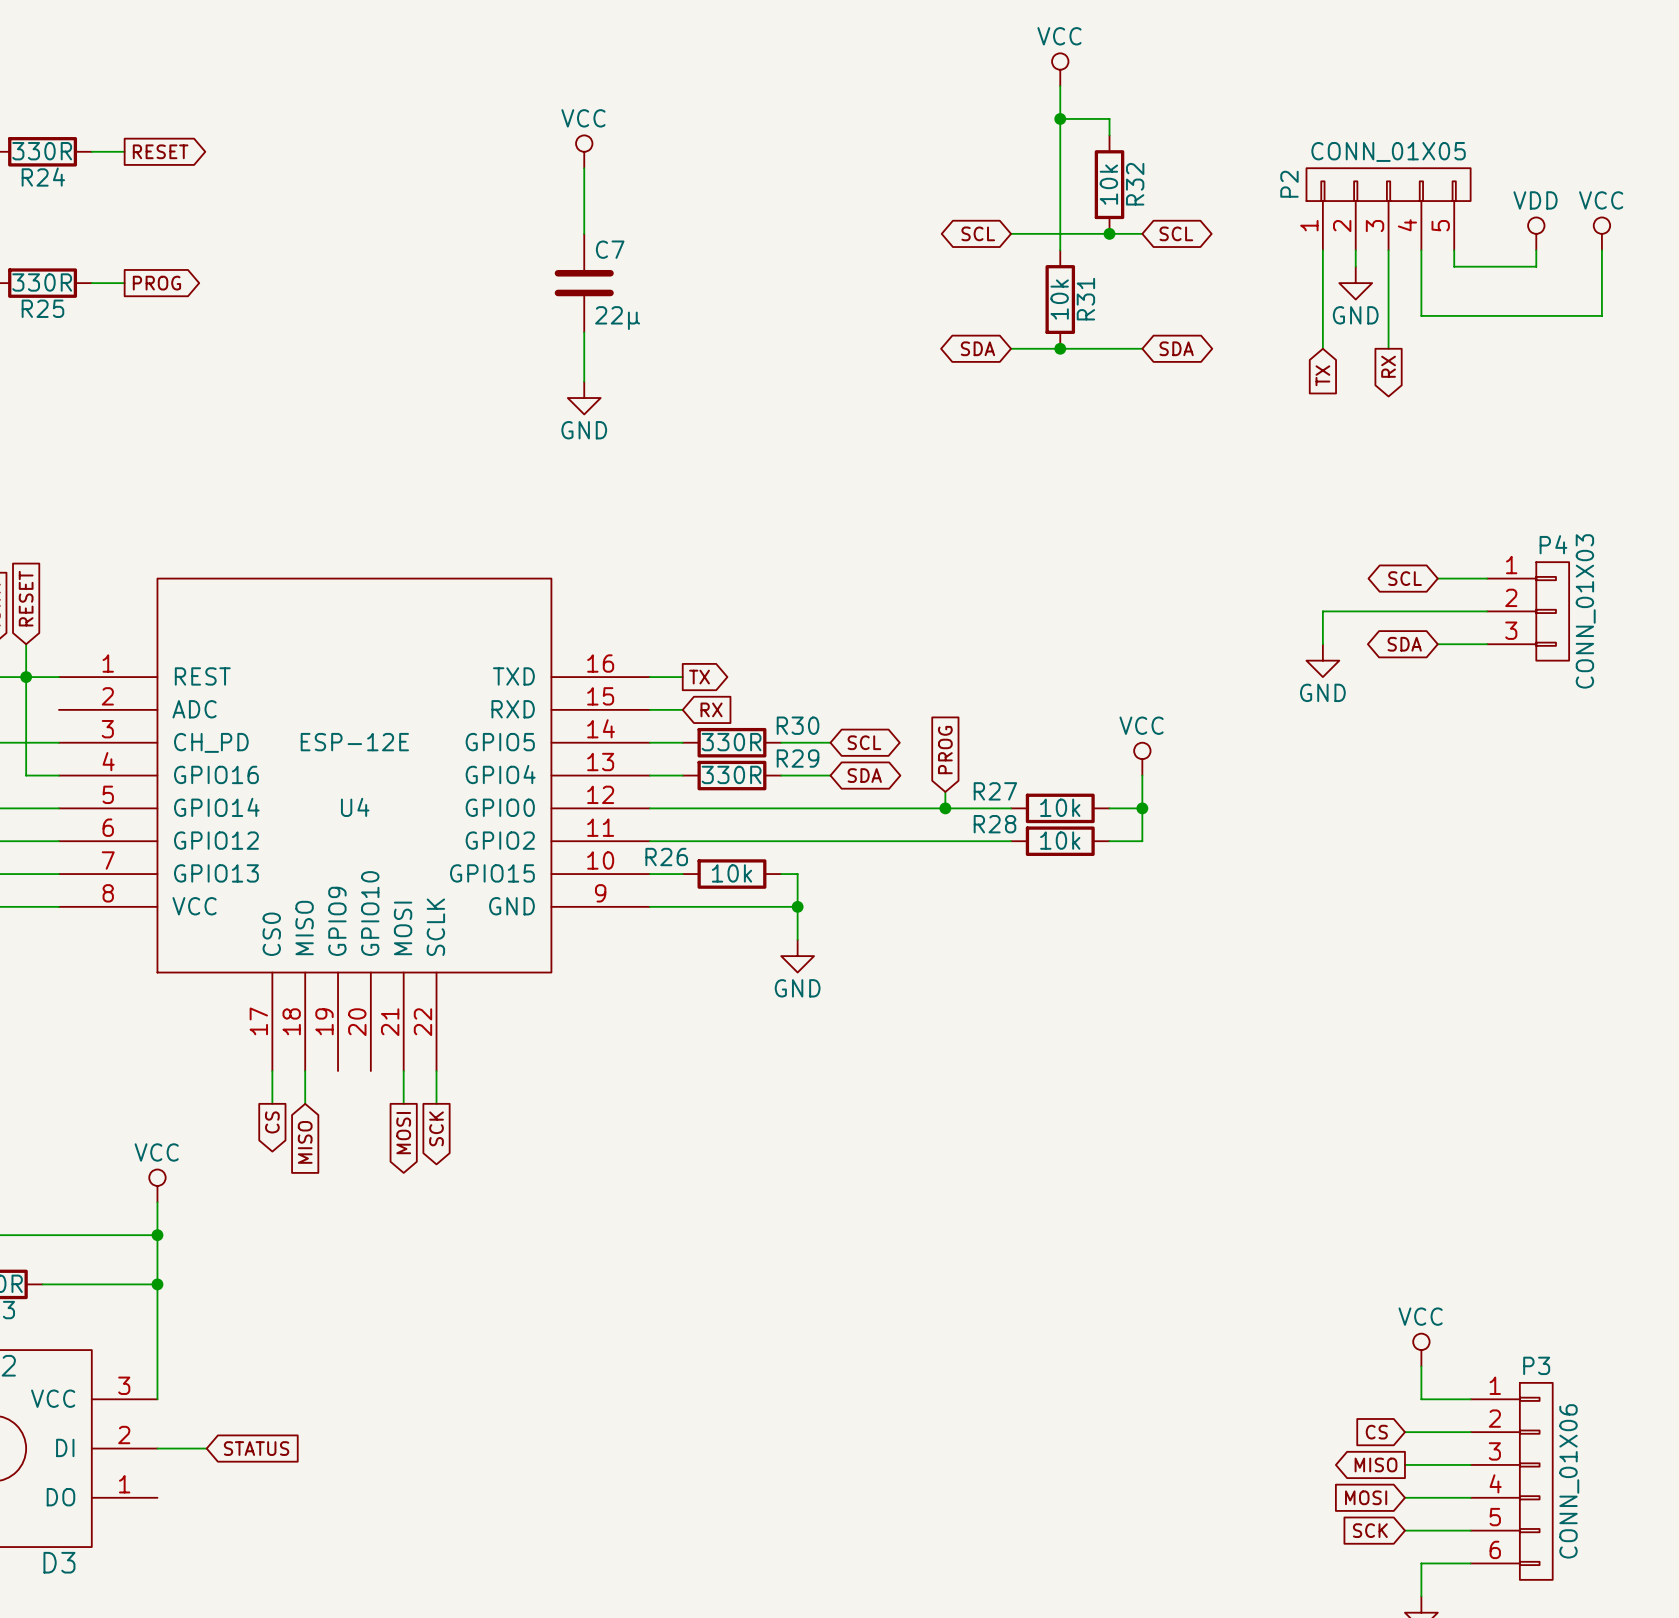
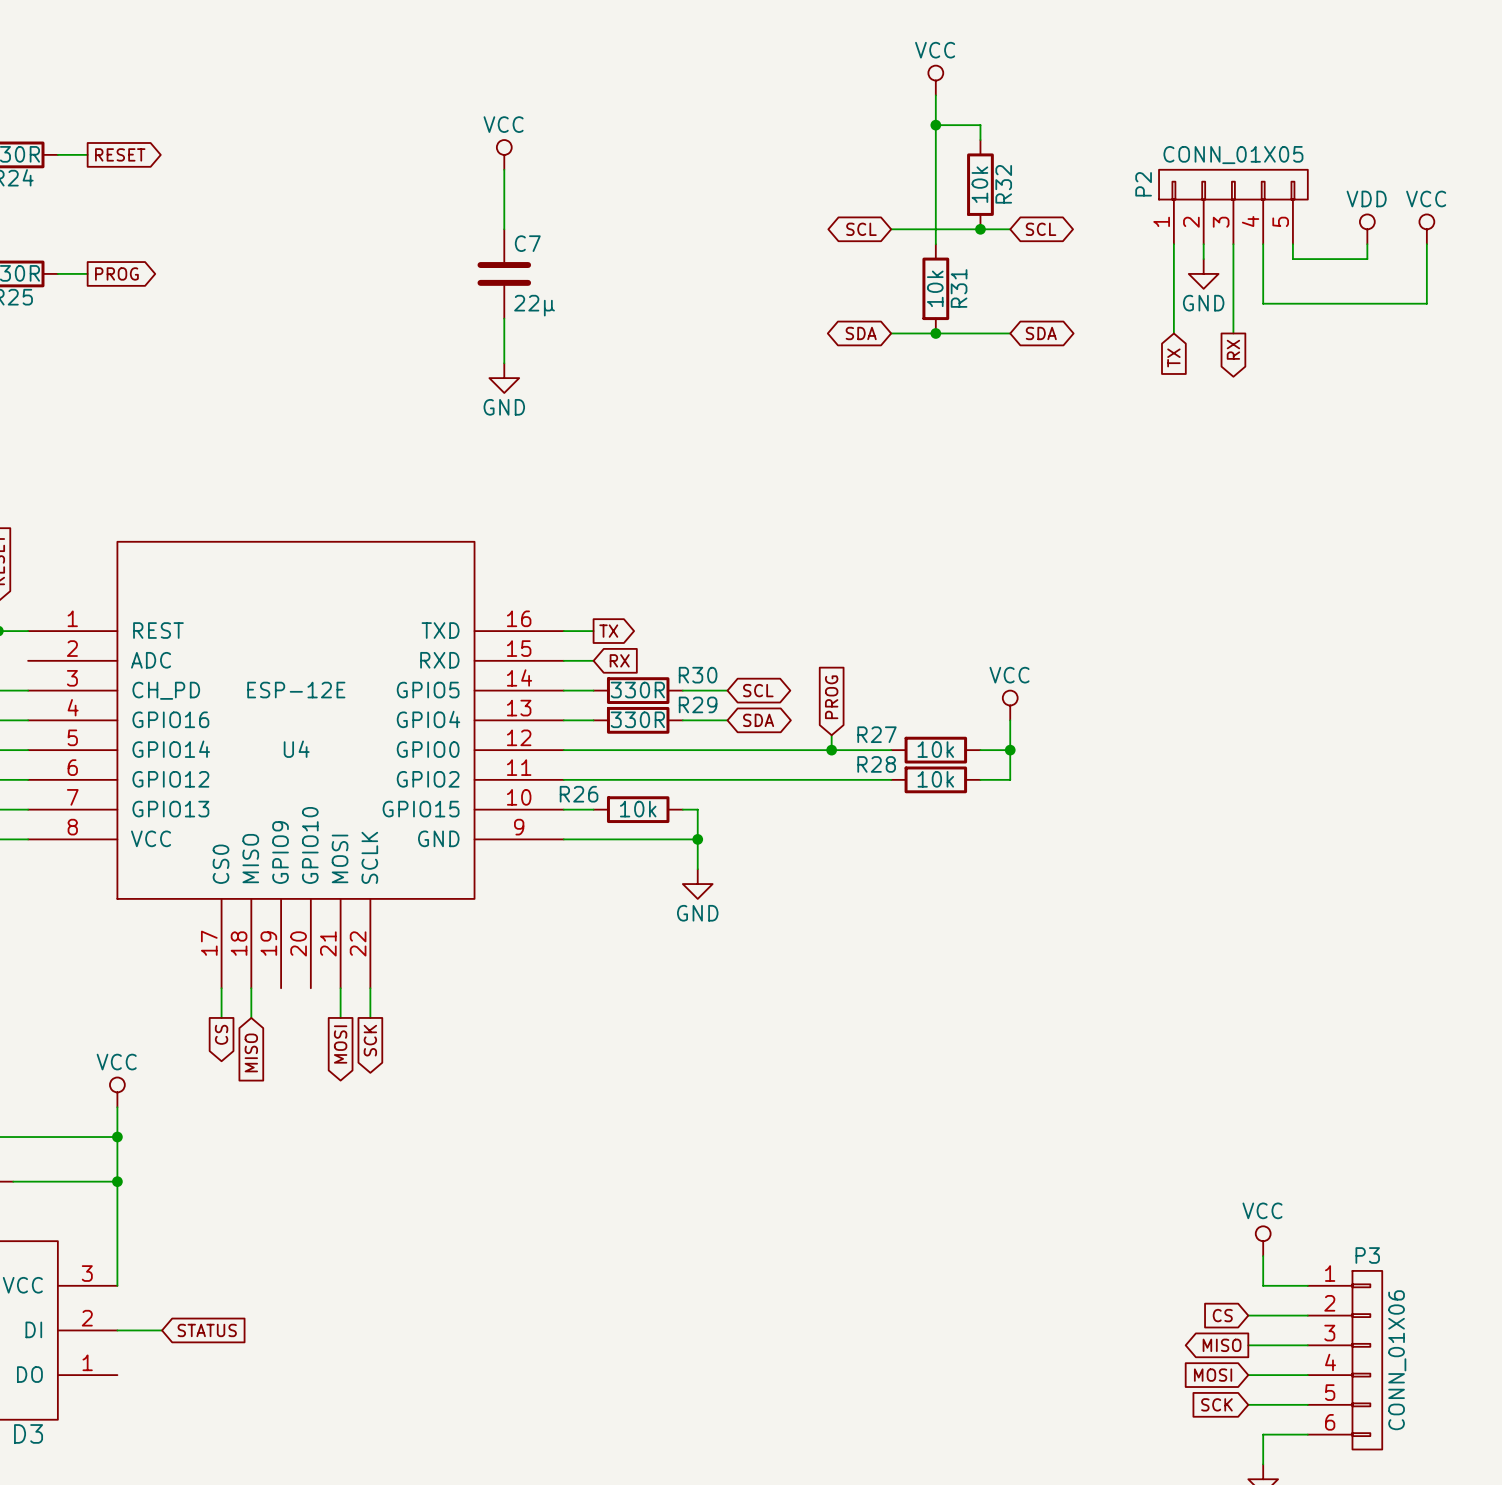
global label: SCL (1405, 578) -> none
wire: (1437, 578) (1487, 578) -> none
wire: (1487, 611) (1322, 611) (1322, 644) -> none
P4: CONN_01X03 (1528, 611) -> none
global label: SDA (1404, 644) -> none
wire: (1437, 644) (1487, 644) -> none
power symbol: GND (1322, 660) -> none

